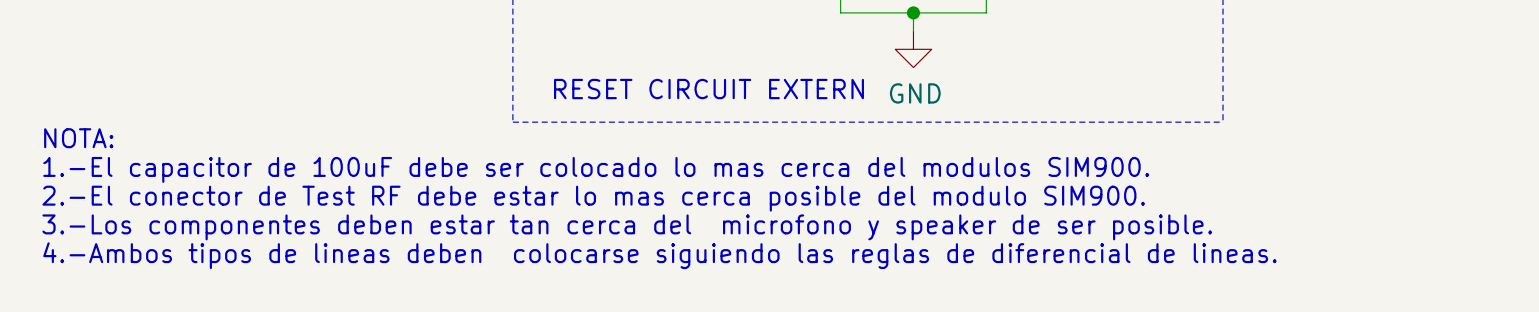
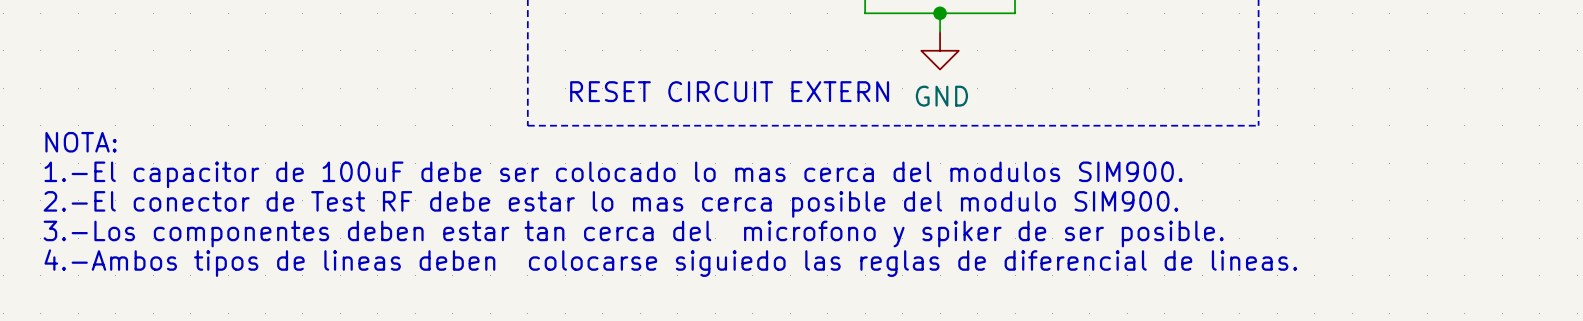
text: 3.-Los componentes deben estar tan cerca del microfono y speaker de ser posible. (627, 227) -> 3.-Los componentes deben estar tan cerca del microfono y spiker de ser posible. (633, 233)
text: 4.-Ambos tipos de lineas deben colocarse siguiendo las reglas de diferencial de lineas. (659, 255) -> 4.-Ambos tipos de lineas deben colocarse siguiedo las reglas de diferencial de lineas. (670, 263)

